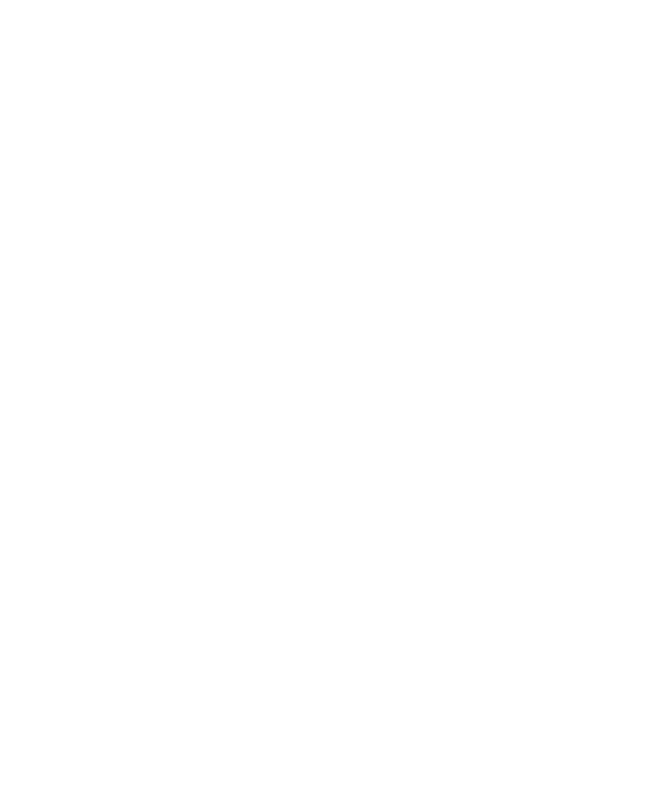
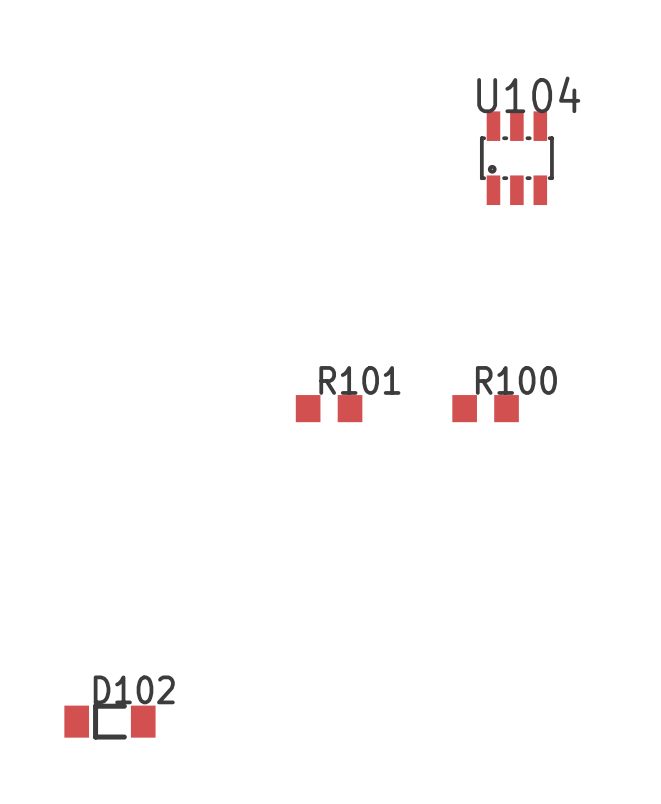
U104: none -> (516, 158)
R101: none -> (329, 408)
R100: none -> (485, 408)
D102: none -> (109, 721)

